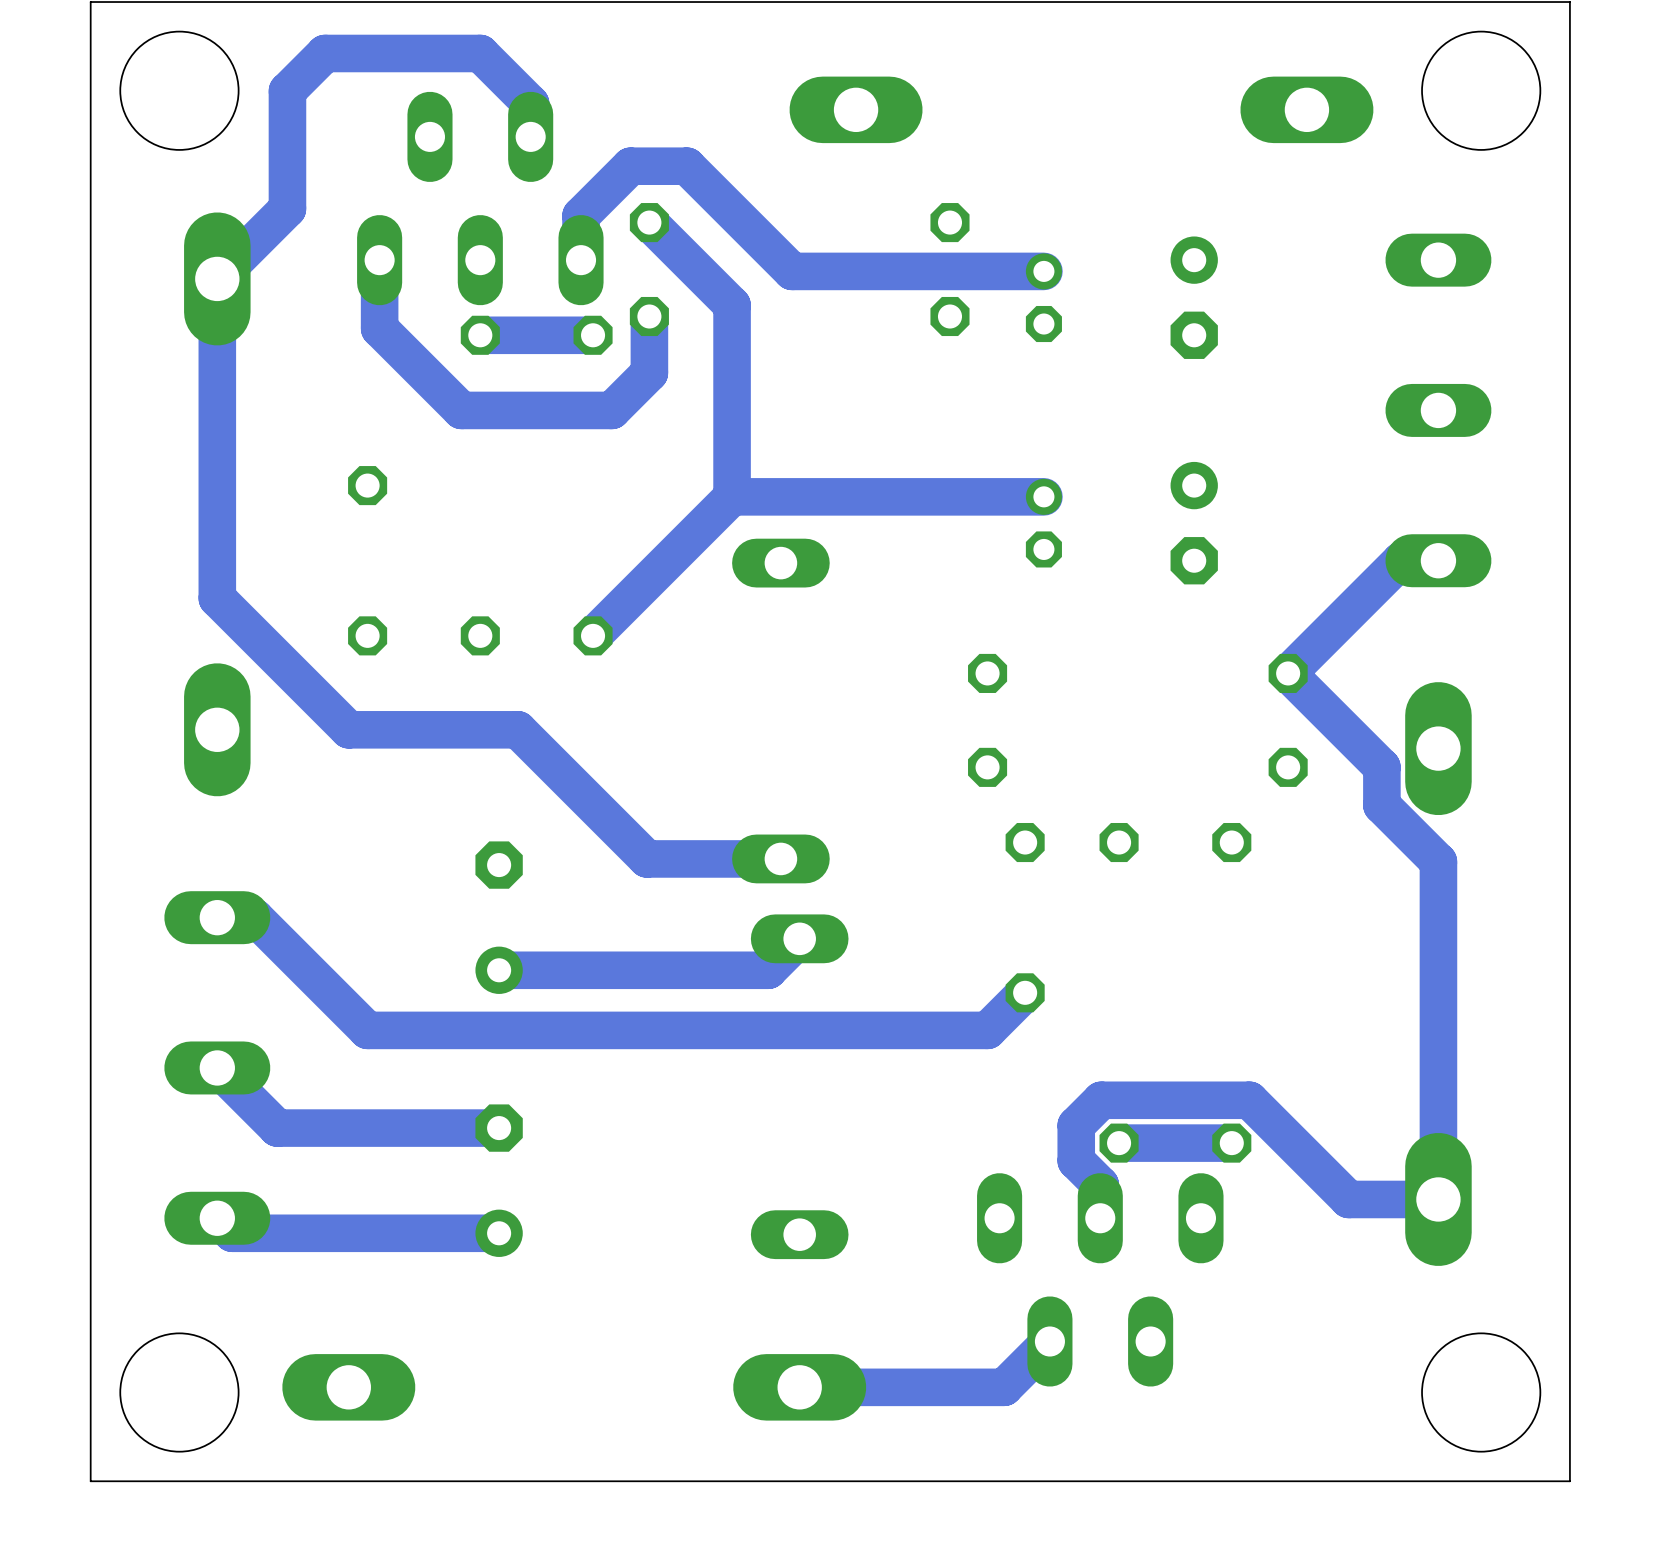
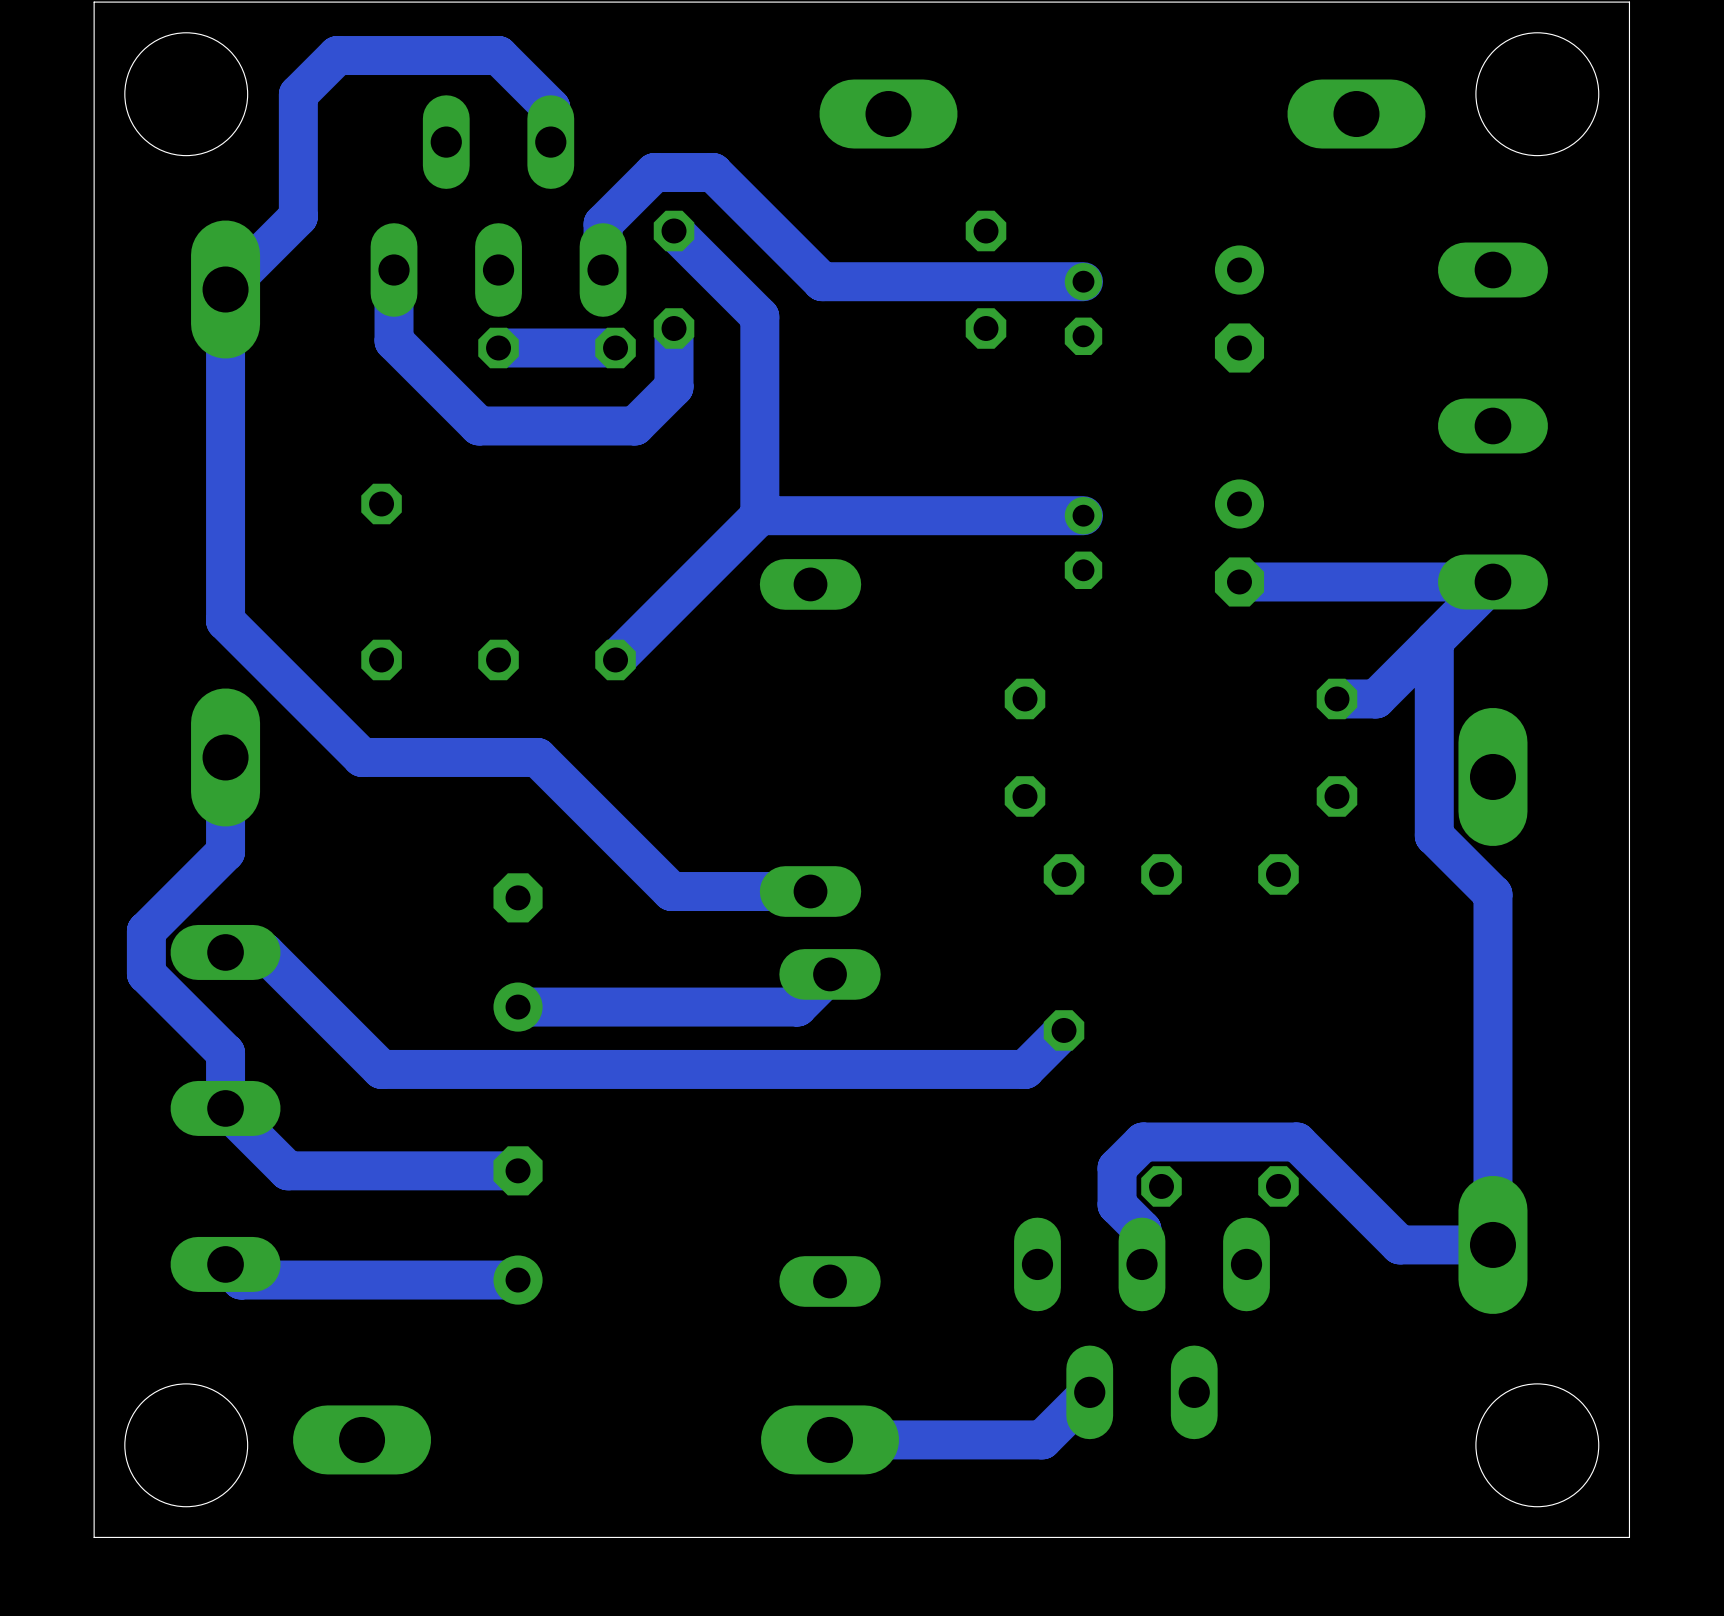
track: (1400, 560) (1288, 673) (1381, 767) -> (1434, 640) (1434, 796)
track: none -> (1453, 581) (1239, 581)
track: none -> (1492, 581) (1375, 698) (1336, 698)
track: none -> (225, 757) (225, 851) (146, 931) (146, 973) (225, 1053) (225, 1108)
track: (1231, 1143) (1119, 1143) -> none

